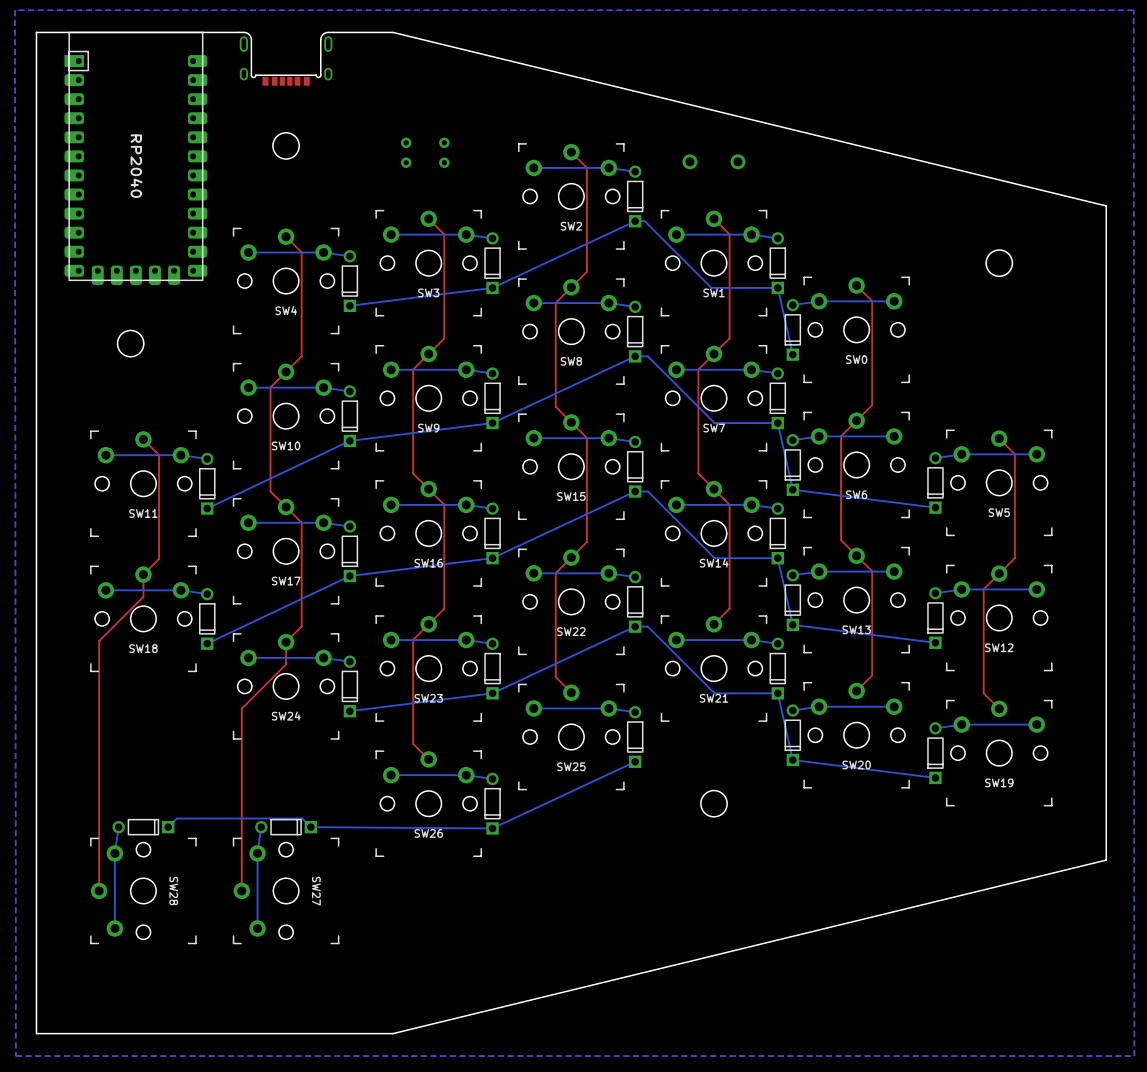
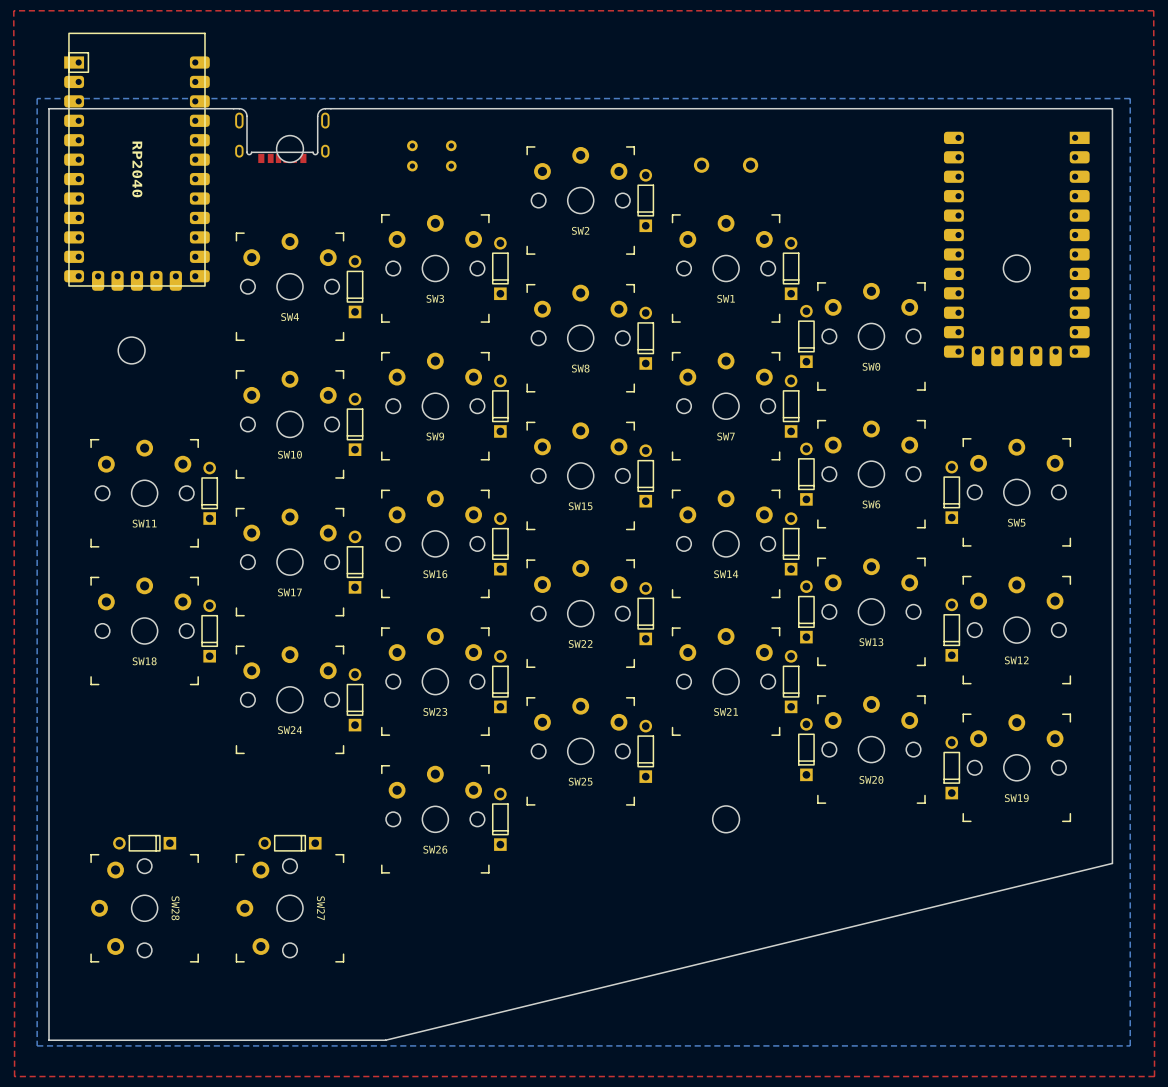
bottom zone outline: (1133, 10) (15, 10) (15, 1056) (1134, 1056) (1133, 10) -> (1130, 98) (1130, 1045) (37, 1045) (37, 98) (1130, 98)
board edge: (333, 32) (393, 32) (1106, 205) (1106, 860) (393, 1033) (36, 1033) (36, 32) (238, 32) -> none
part position: (286, 58) -> (282, 135)
board edge: none -> (330, 108) (1112, 108) (1112, 863) (385, 1040) (49, 1040) (49, 108) (233, 108)
top track: (571, 152) (586, 167) (586, 271) (555, 302) (555, 406) (586, 438) (586, 541) (555, 573) (555, 677) (571, 692) -> none
bottom track: (533, 167) (608, 167) (635, 171) -> none
top track: (428, 218) (444, 234) (444, 338) (413, 369) (413, 473) (444, 504) (444, 608) (413, 639) (413, 743) (428, 759) -> none
top track: (714, 218) (729, 234) (729, 338) (698, 369) (698, 473) (729, 504) (729, 608) (714, 624) -> none
bottom track: (391, 234) (466, 234) (492, 238) -> none
bottom track: (676, 234) (751, 234) (777, 238) -> none
top track: (286, 236) (301, 252) (301, 356) (270, 387) (270, 491) (301, 522) (301, 626) (286, 642) (286, 664) (241, 708) (241, 890) -> none
part: none -> (1016, 248)
bottom track: (248, 252) (323, 252) (349, 256) -> none
top track: (856, 285) (872, 301) (872, 405) (841, 436) (841, 540) (872, 571) (872, 675) (856, 690) -> none
bottom track: (894, 301) (819, 301) (792, 305) -> none
bottom track: (533, 303) (608, 303) (635, 306) -> none
bottom track: (349, 305) (492, 287) (635, 221) (644, 221) (711, 287) (777, 287) (792, 354) -> none
bottom track: (391, 369) (466, 369) (492, 373) -> none
bottom track: (676, 369) (751, 369) (777, 373) -> none
bottom track: (248, 387) (323, 387) (349, 391) -> none
bottom track: (894, 436) (819, 436) (792, 440) -> none
bottom track: (533, 438) (608, 438) (635, 441) -> none
top track: (999, 438) (1014, 454) (1014, 558) (983, 589) (983, 693) (999, 708) -> none
top track: (143, 439) (159, 455) (159, 558) (143, 574) (143, 596) (99, 641) (99, 890) -> none
bottom track: (1036, 454) (961, 454) (935, 458) -> none
bottom track: (105, 455) (180, 455) (207, 458) -> none
bottom track: (391, 504) (466, 504) (492, 508) -> none
bottom track: (676, 504) (751, 504) (777, 508) -> none
bottom track: (935, 507) (792, 489) (777, 423) (714, 423) (647, 356) (635, 356) (492, 423) (349, 440) (207, 508) -> none
bottom track: (248, 522) (323, 522) (349, 526) -> none
bottom track: (894, 571) (819, 571) (792, 575) -> none
bottom track: (533, 573) (608, 573) (635, 577) -> none
bottom track: (1036, 589) (961, 589) (935, 593) -> none
bottom track: (105, 590) (180, 590) (207, 594) -> none
bottom track: (391, 640) (466, 640) (492, 643) -> none
bottom track: (676, 640) (751, 640) (777, 643) -> none
bottom track: (935, 642) (792, 624) (777, 558) (714, 558) (647, 491) (635, 491) (492, 558) (349, 576) (207, 643) -> none
bottom track: (248, 657) (323, 657) (349, 661) -> none
bottom track: (894, 706) (819, 706) (792, 710) -> none
bottom track: (533, 708) (608, 708) (635, 712) -> none
bottom track: (349, 711) (492, 693) (635, 626) (647, 626) (714, 693) (777, 693) (792, 760) (935, 777) -> none
bottom track: (1036, 724) (961, 724) (935, 728) -> none
bottom track: (635, 761) (492, 828) (310, 827) (302, 818) (176, 818) (168, 827) -> none
bottom track: (391, 775) (466, 775) (492, 778) -> none
bottom track: (118, 827) (114, 853) (114, 928) -> none
bottom track: (261, 827) (257, 853) (257, 928) -> none

